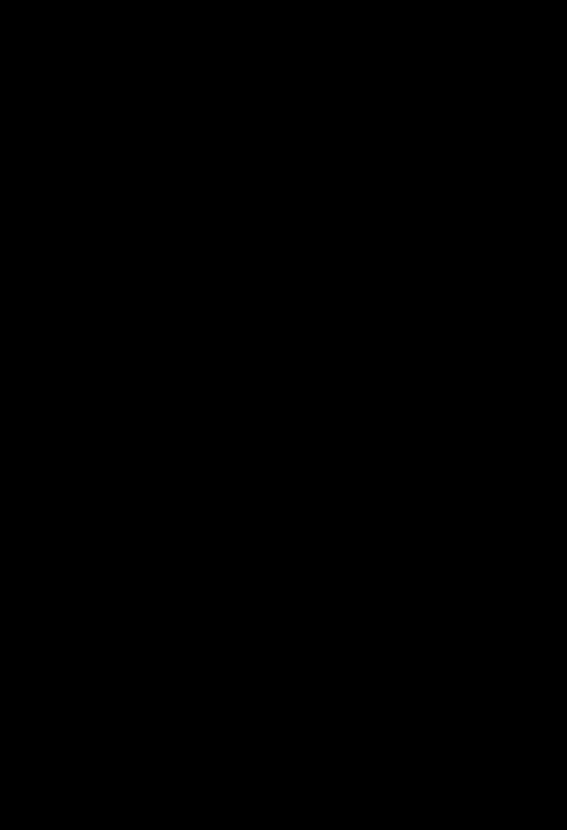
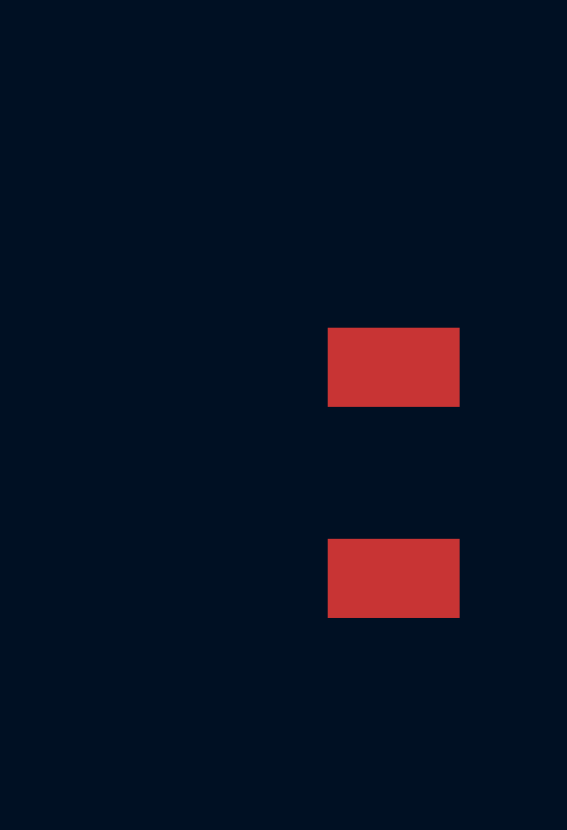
part: none -> (393, 472)

